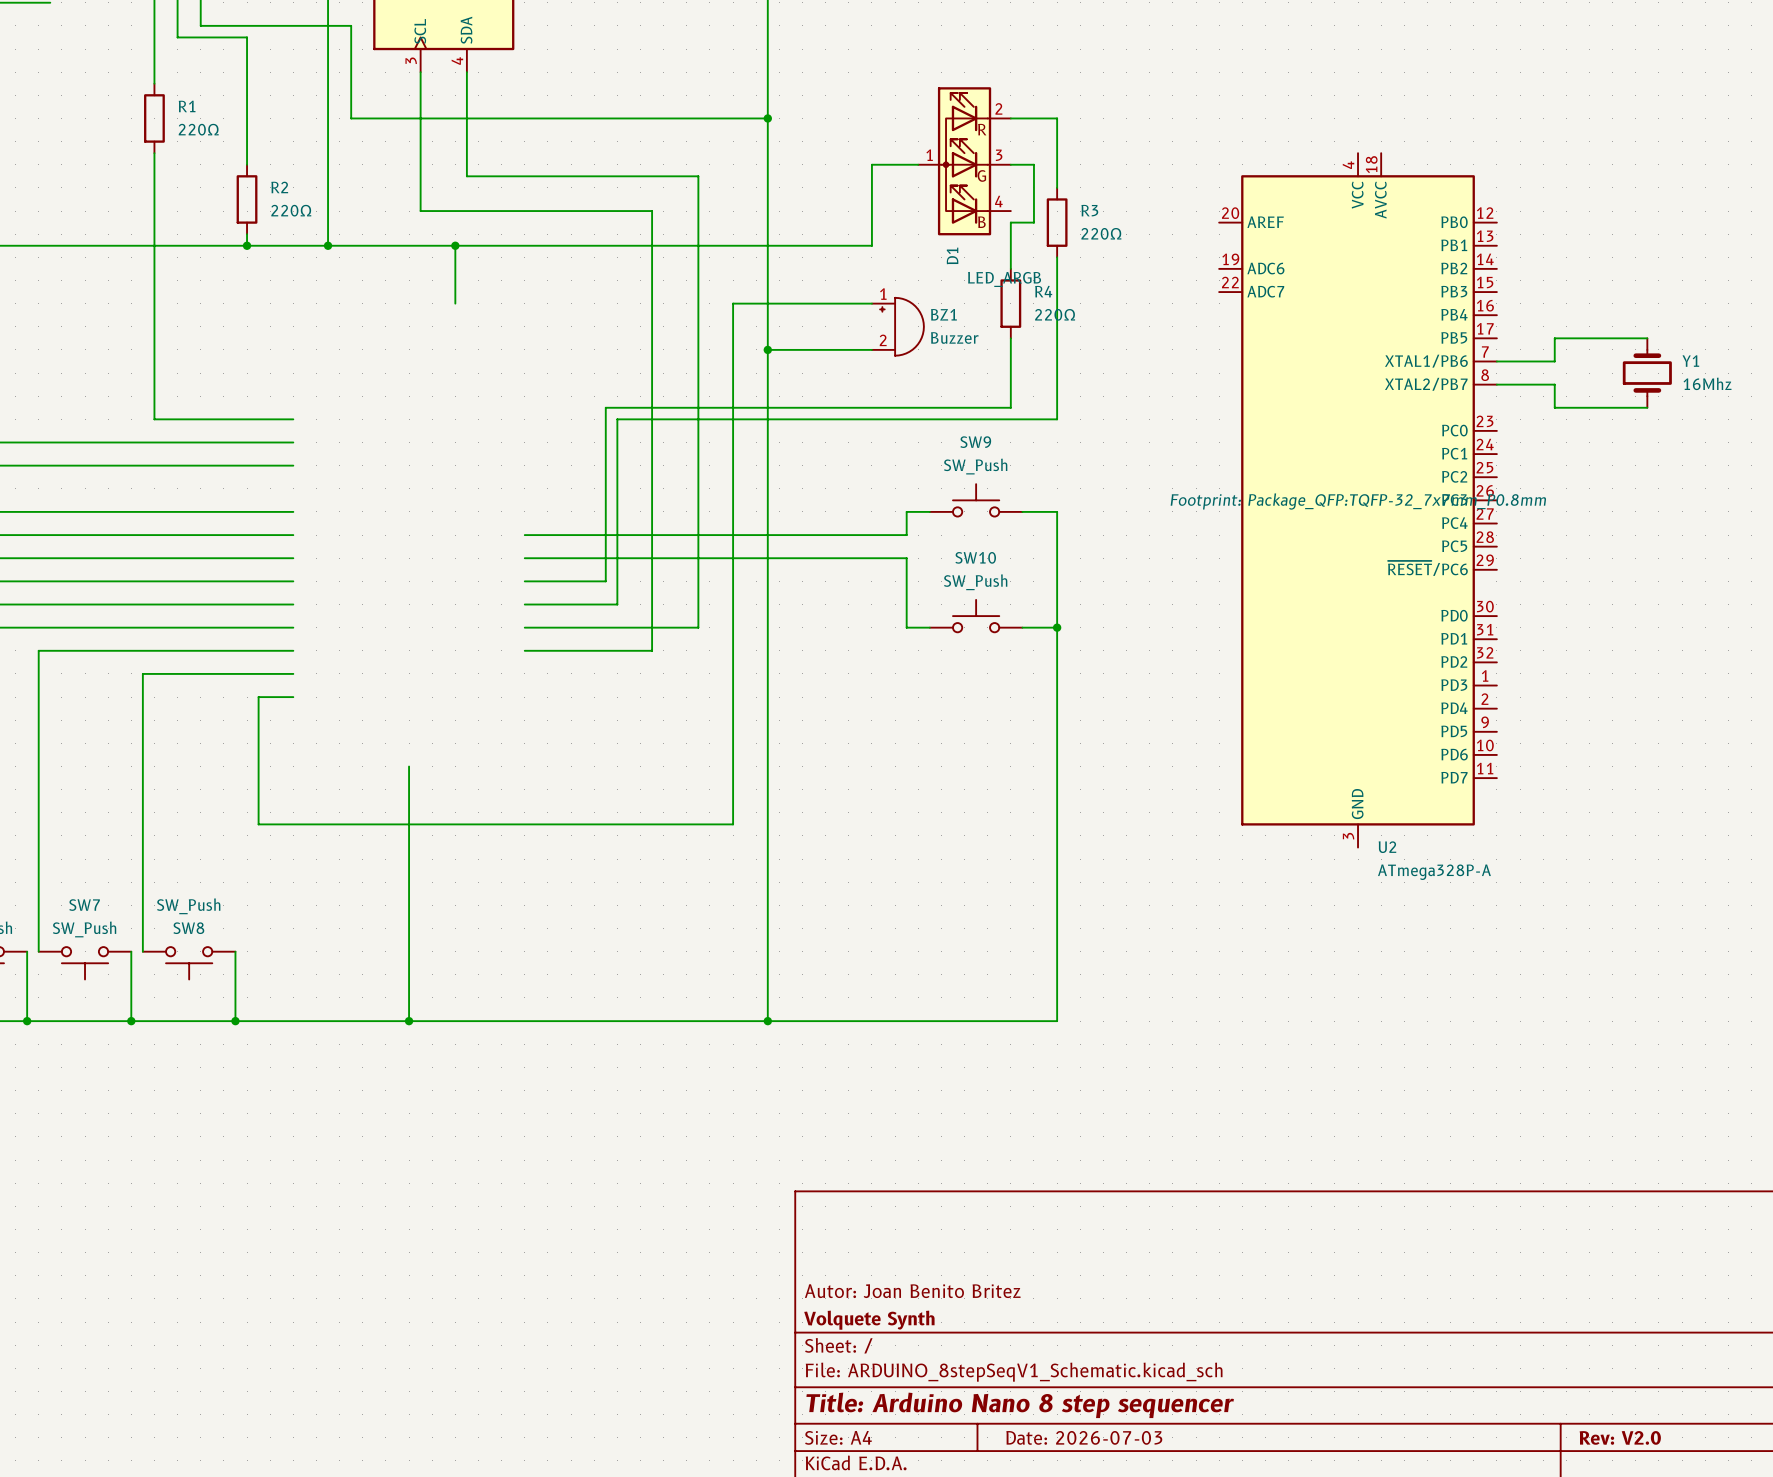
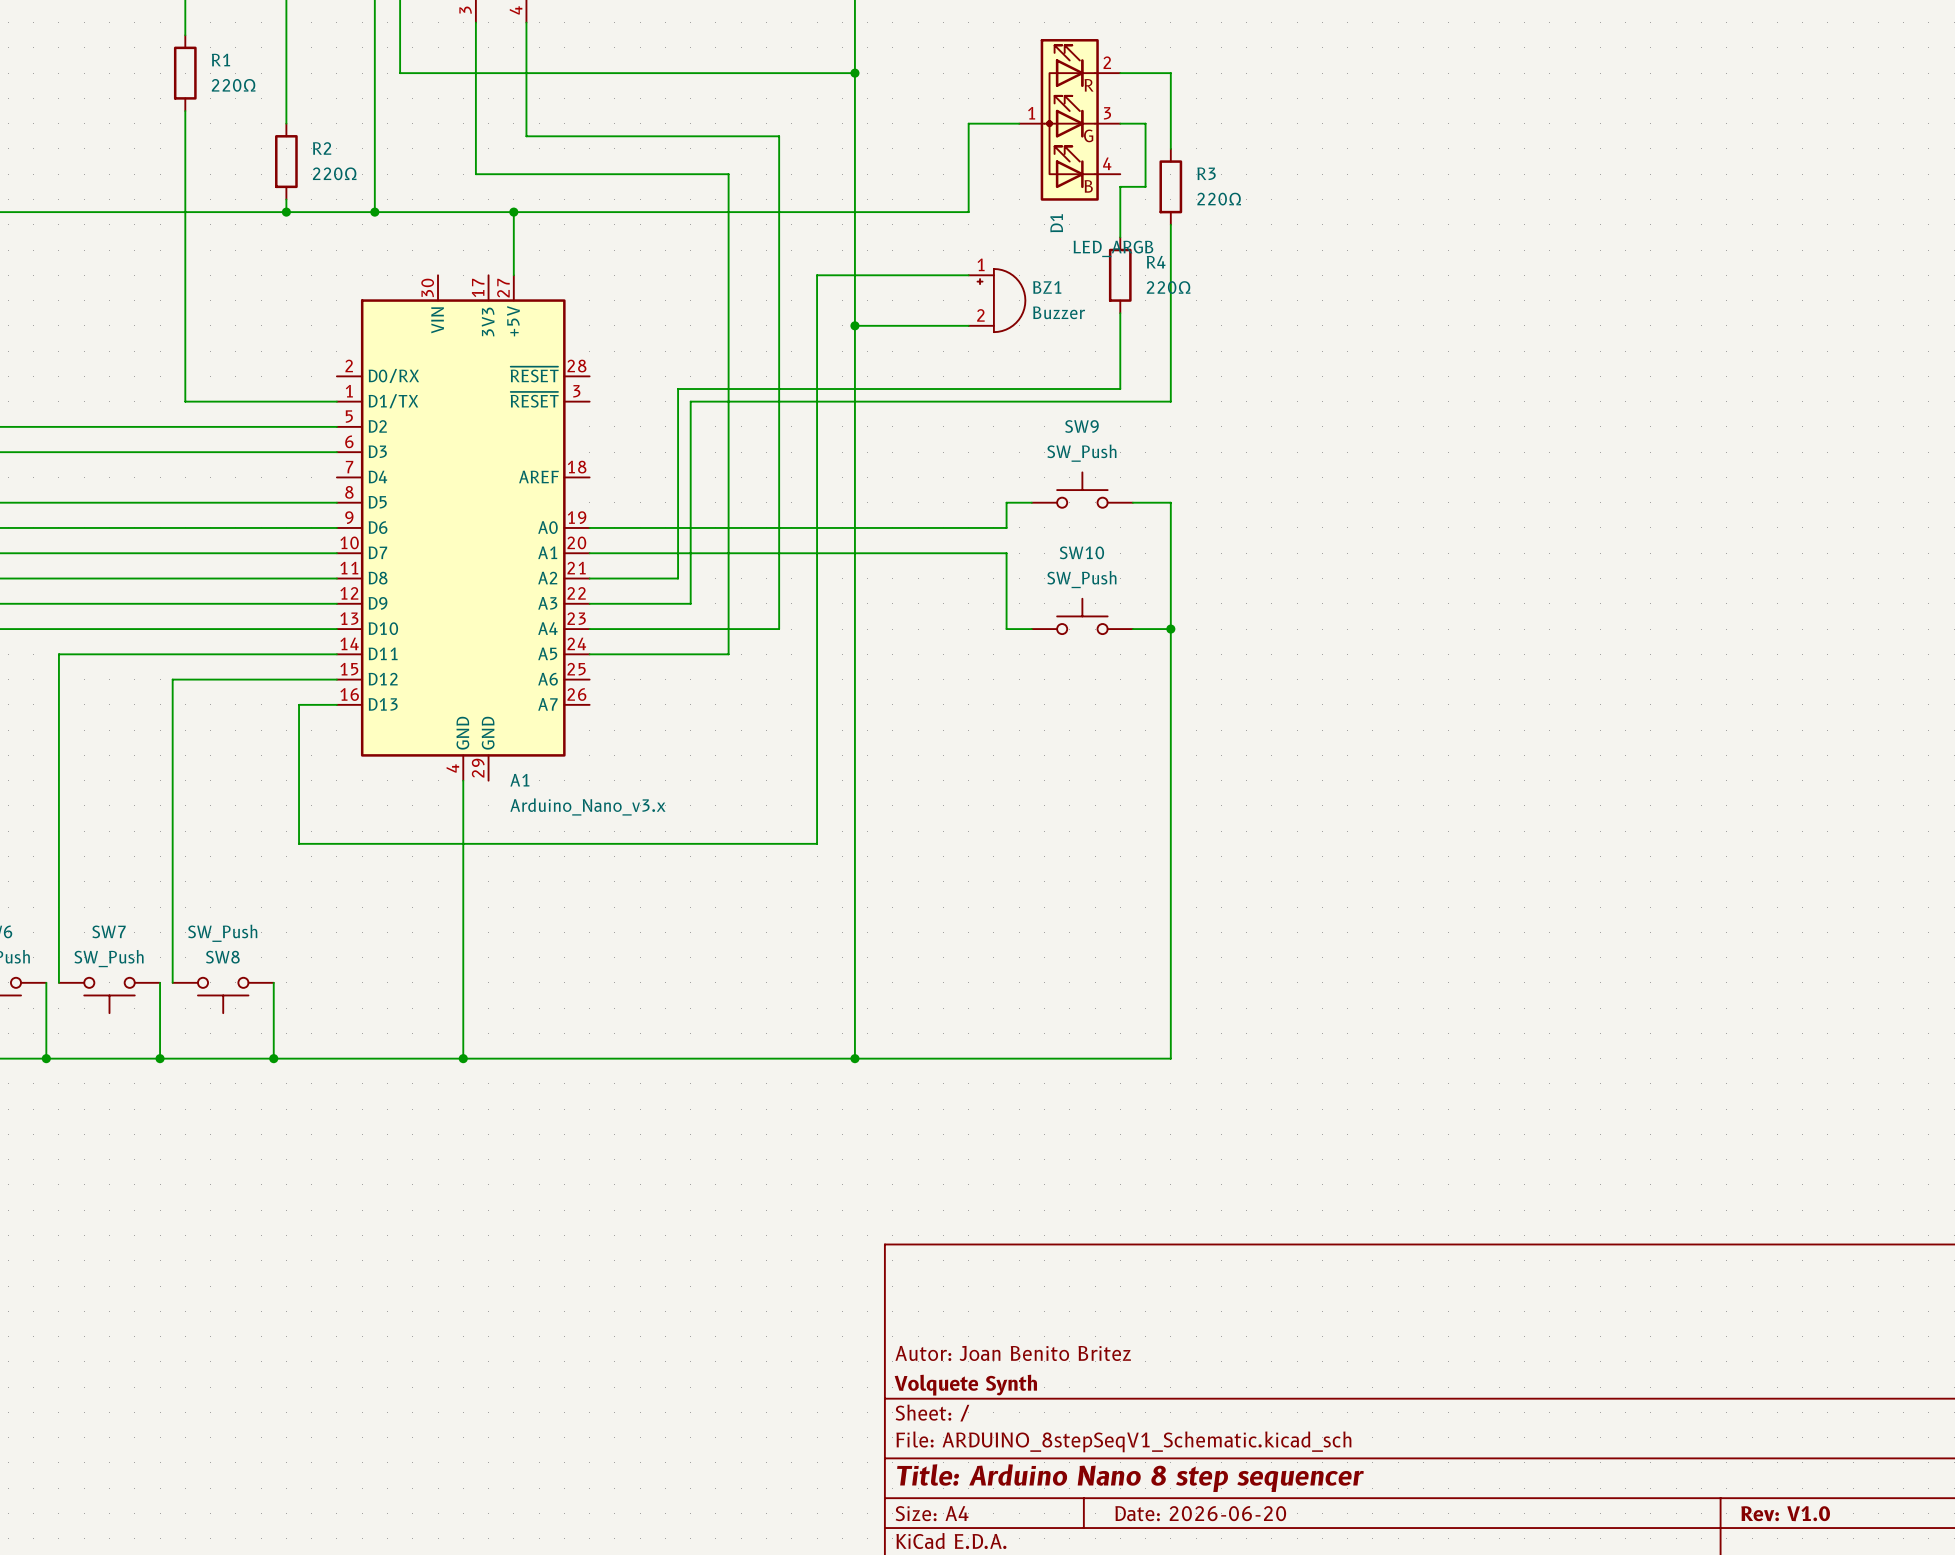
wire: (1647, 338) (1554, 338) (1554, 361) (1496, 361) -> none
Y1: 16Mhz (1647, 373) -> none
wire: (1496, 384) (1554, 384) (1554, 407) (1647, 407) -> none
U2: ATmega328P-A (1358, 500) -> none
A1: none -> Arduino_Nano_v3.x (463, 527)
title block: Date: 2026-07-03 (1084, 1437) -> Date: 2026-06-20 (1200, 1513)
title block: Rev: V2.0 (1620, 1437) -> Rev: V1.0 (1785, 1513)

